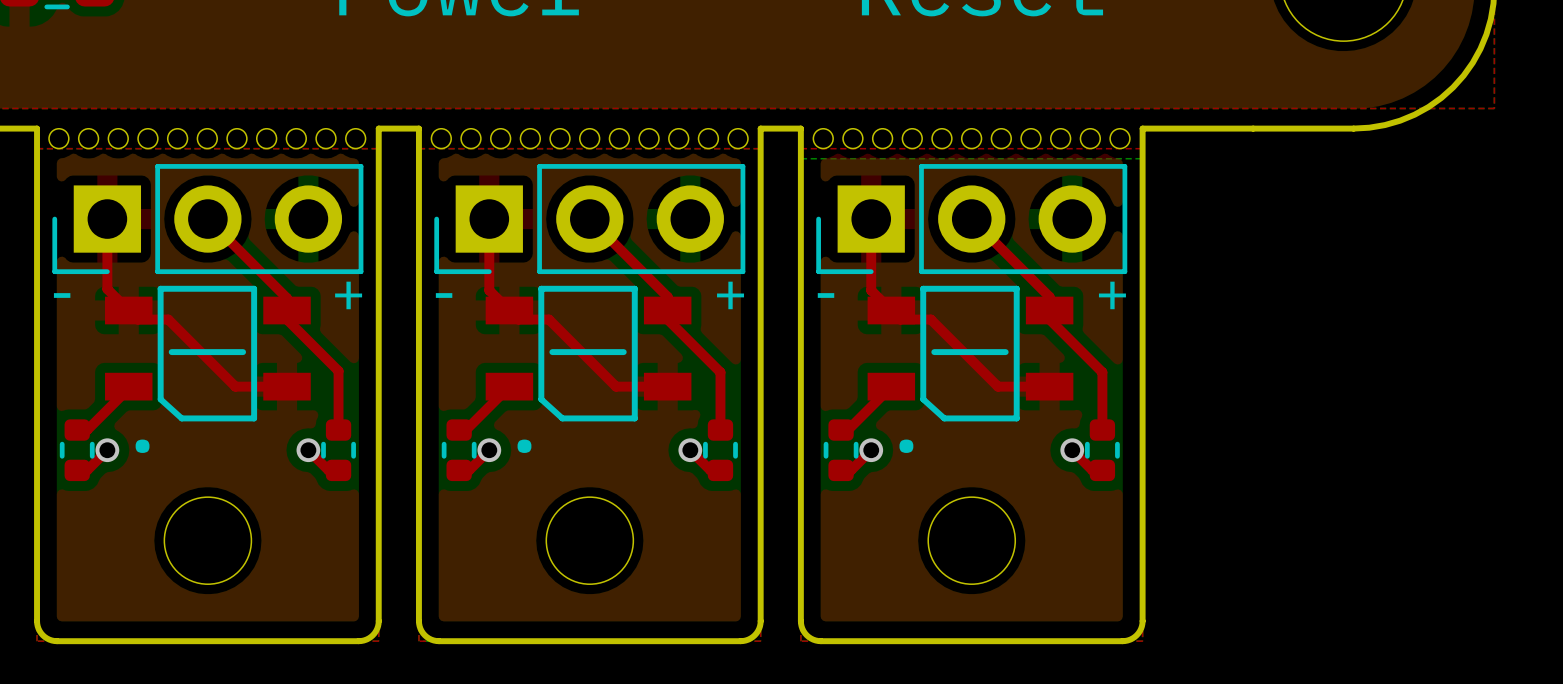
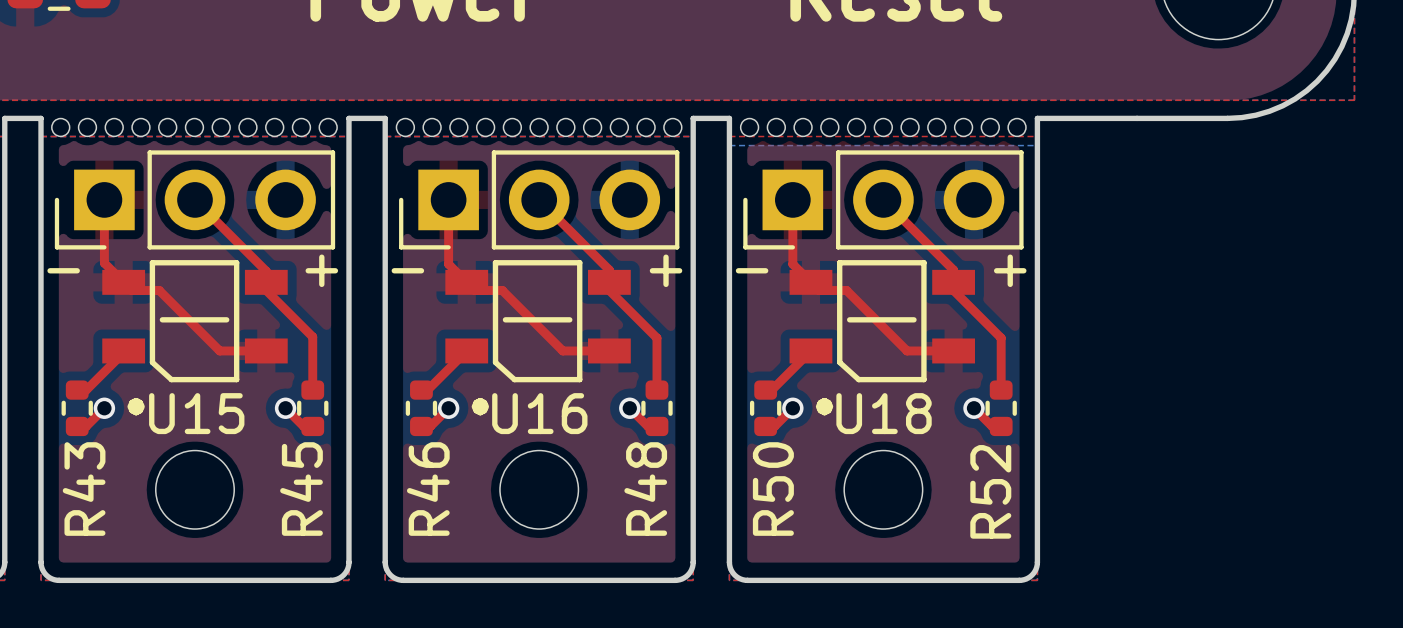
U15 name: none -> U15 (196, 413)
U16 name: none -> U16 (539, 413)
U18 name: none -> U18 (884, 413)
R48 name: none -> R48 (645, 489)
R50 name: none -> R50 (773, 489)
R43 name: none -> R43 (84, 489)
R45 name: none -> R45 (301, 489)
R46 name: none -> R46 (428, 489)
R52 name: none -> R52 (990, 491)

